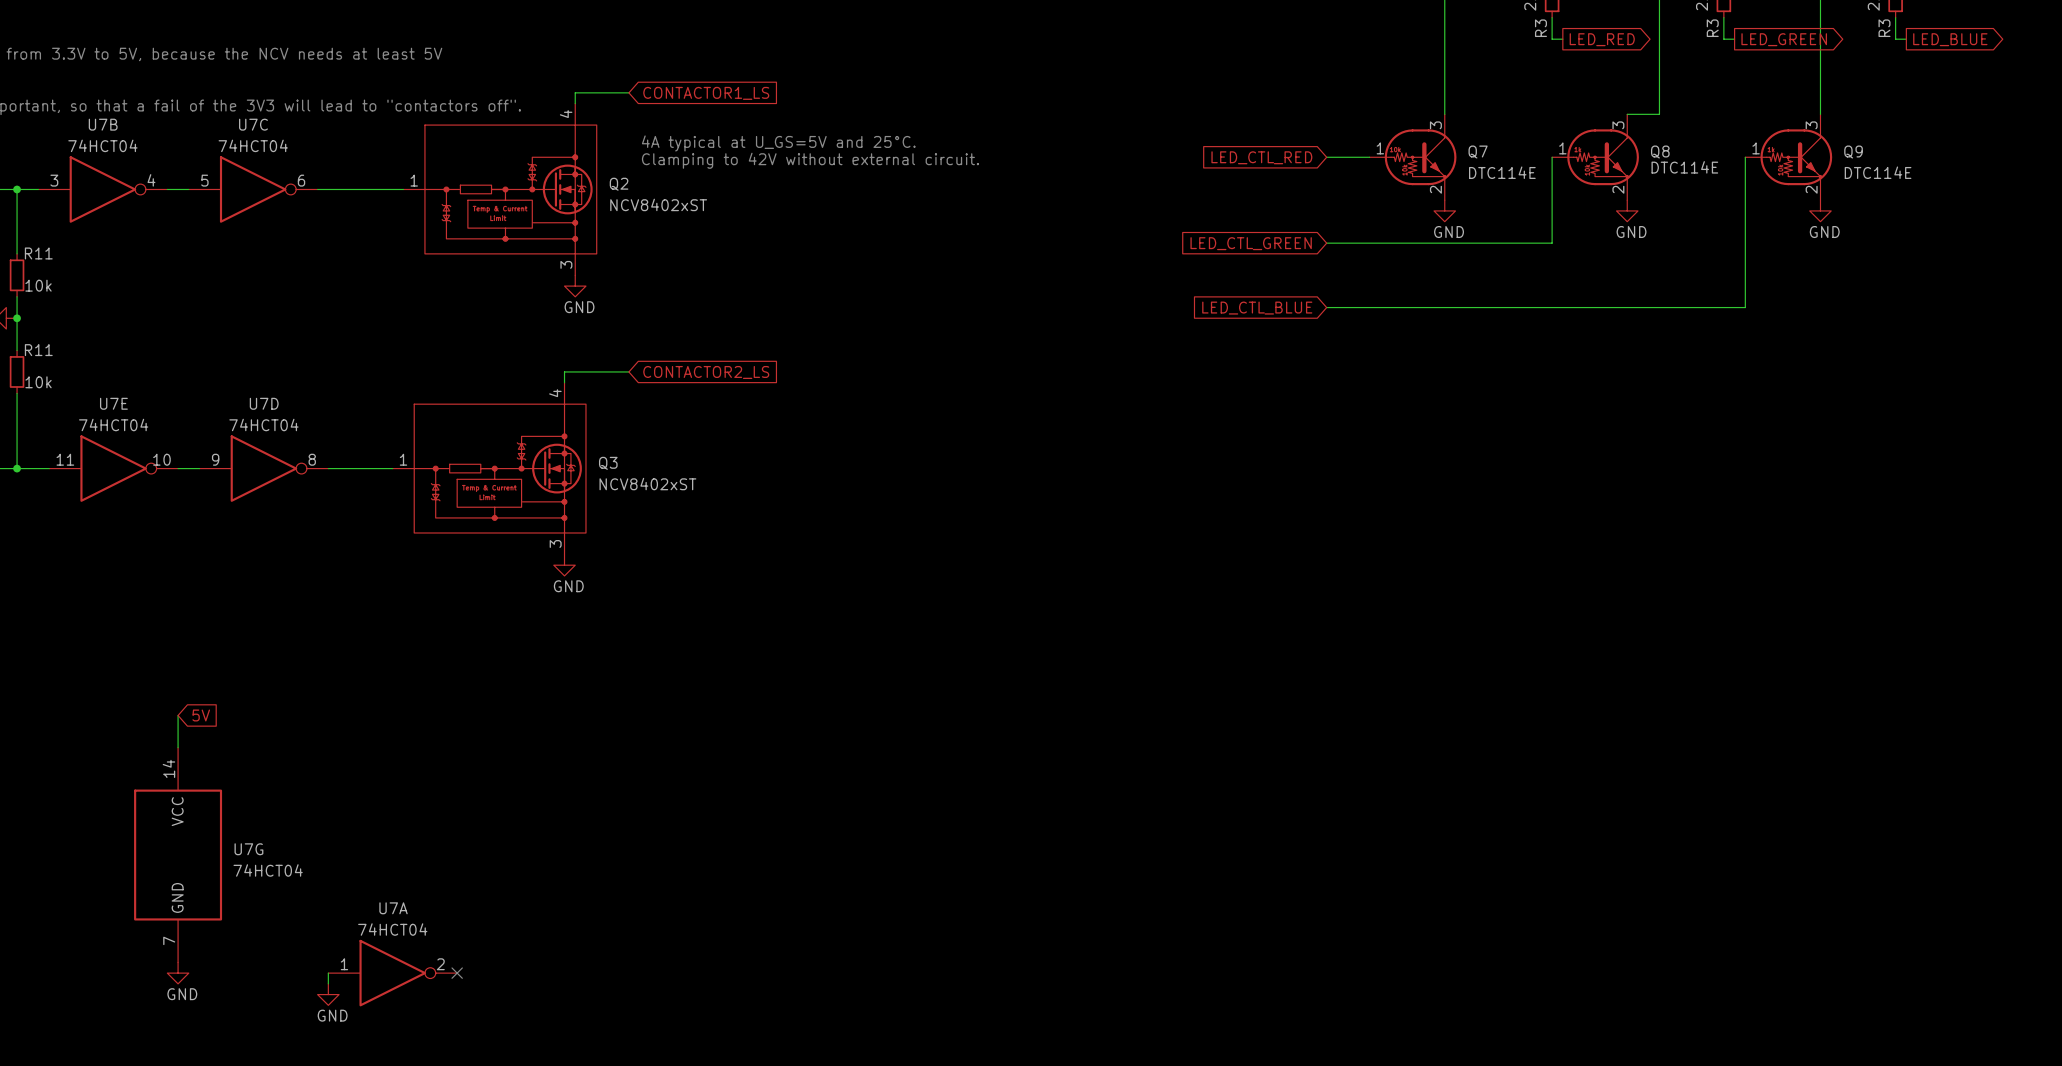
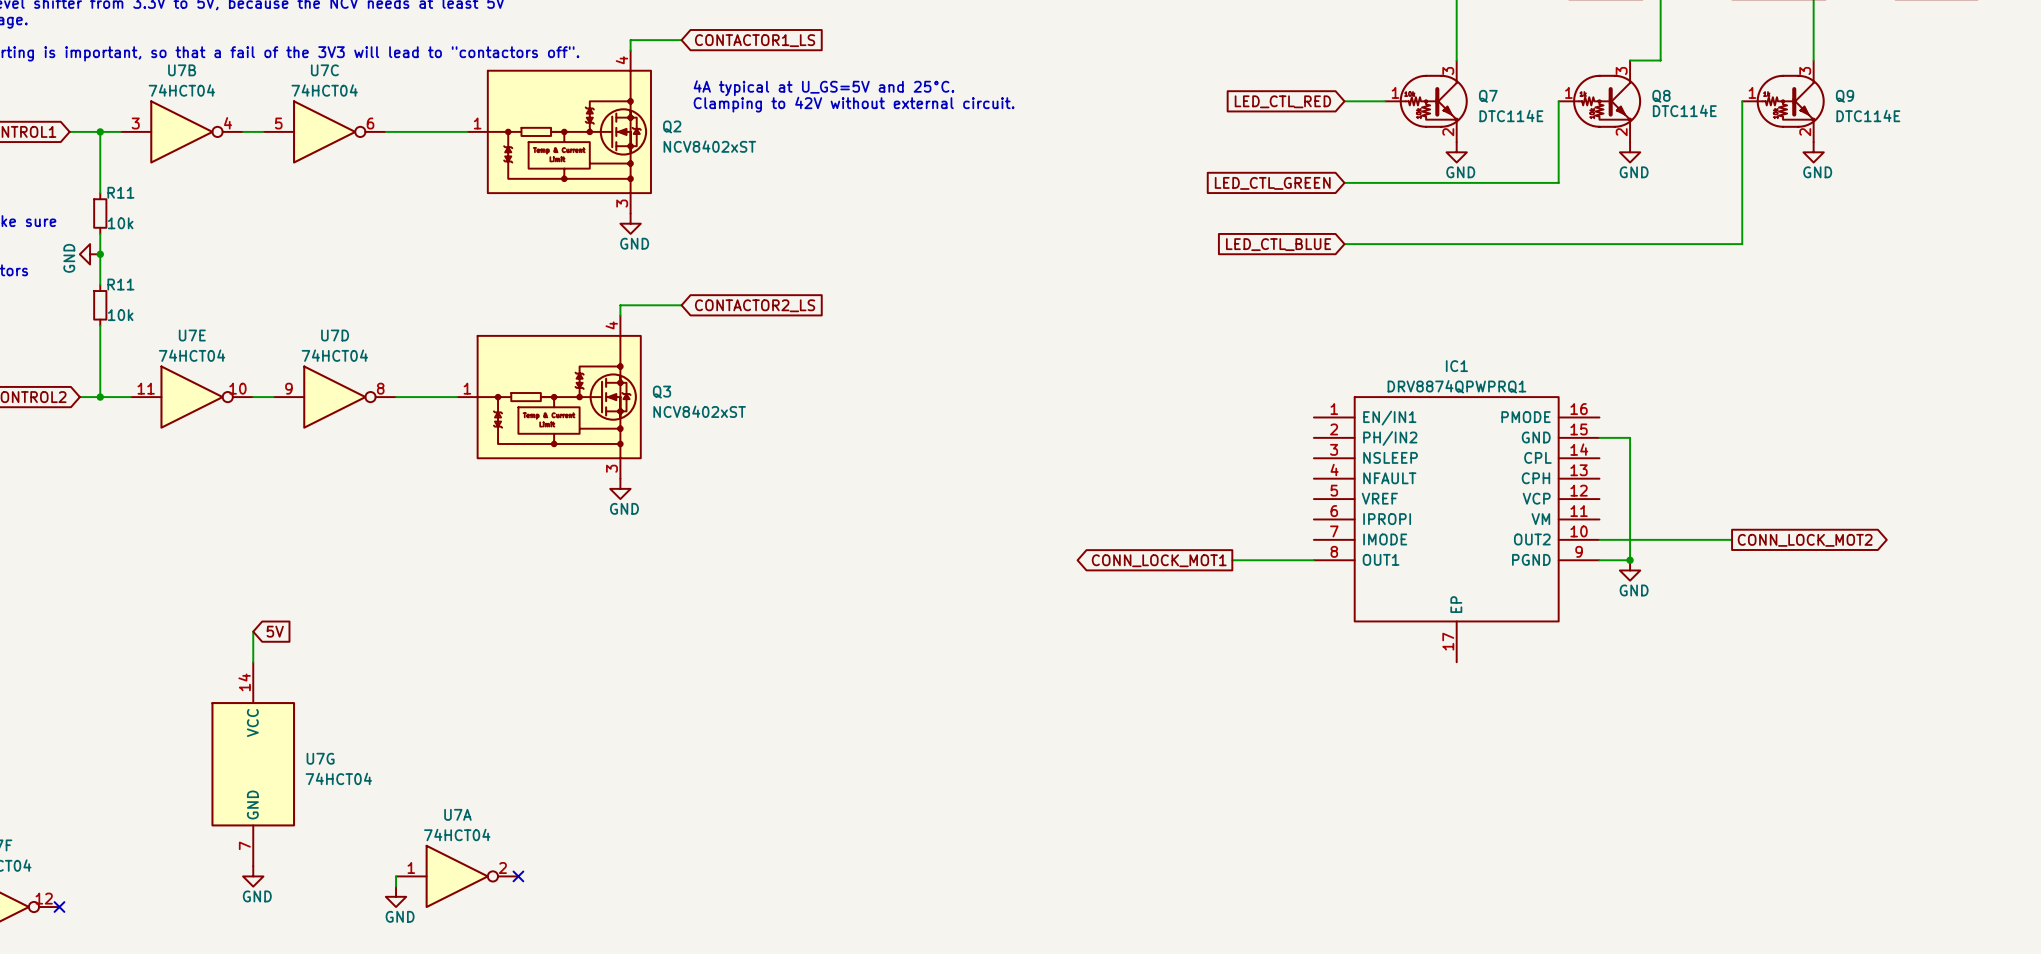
wire: none -> (1599, 437) (1630, 437) (1630, 560) (1599, 560)
IC1: none -> DRV8874QPWPRQ1 (1456, 529)
wire: none -> (1599, 539) (1732, 539)
global label: none -> CONN_LOCK_MOT2 (1805, 540)
global label: none -> CONN_LOCK_MOT1 (1159, 560)
wire: none -> (1232, 560) (1313, 560)
junction: none -> (1630, 560)
power symbol: none -> GND (1630, 570)

